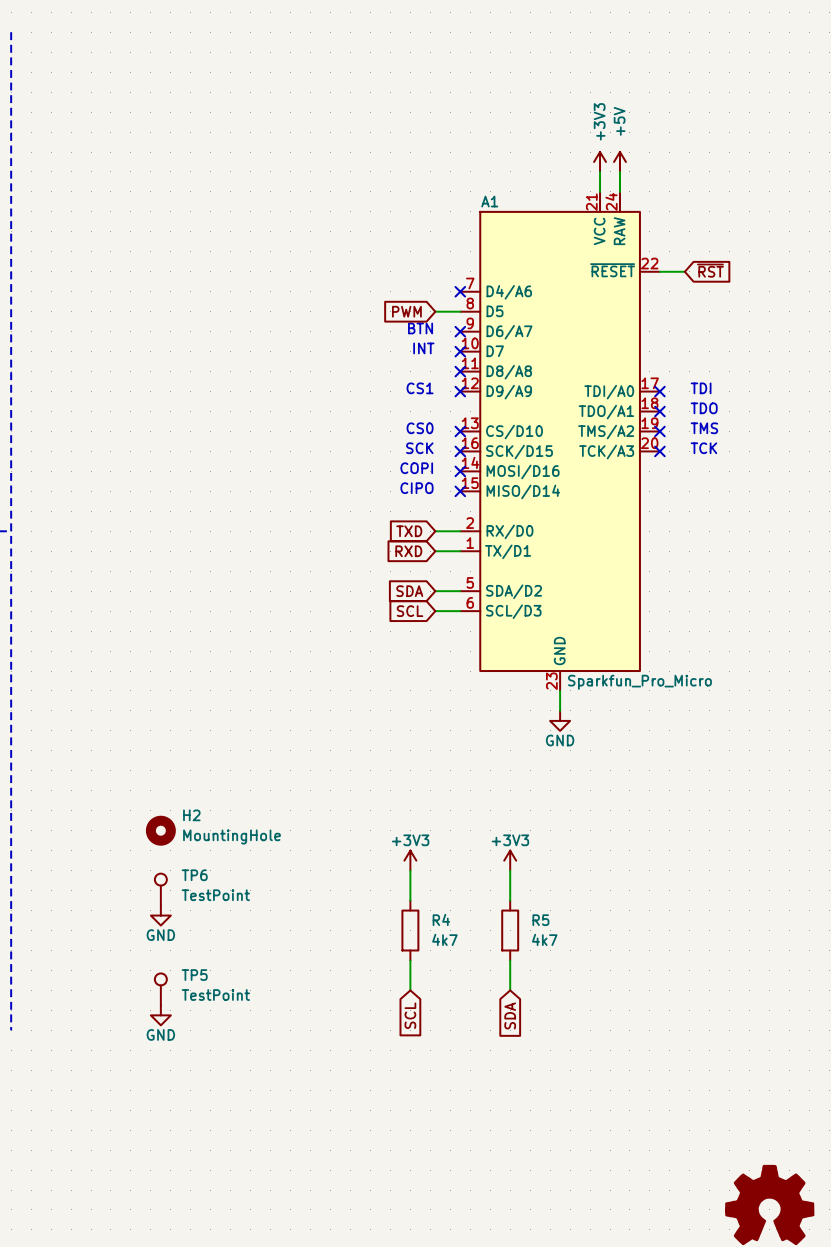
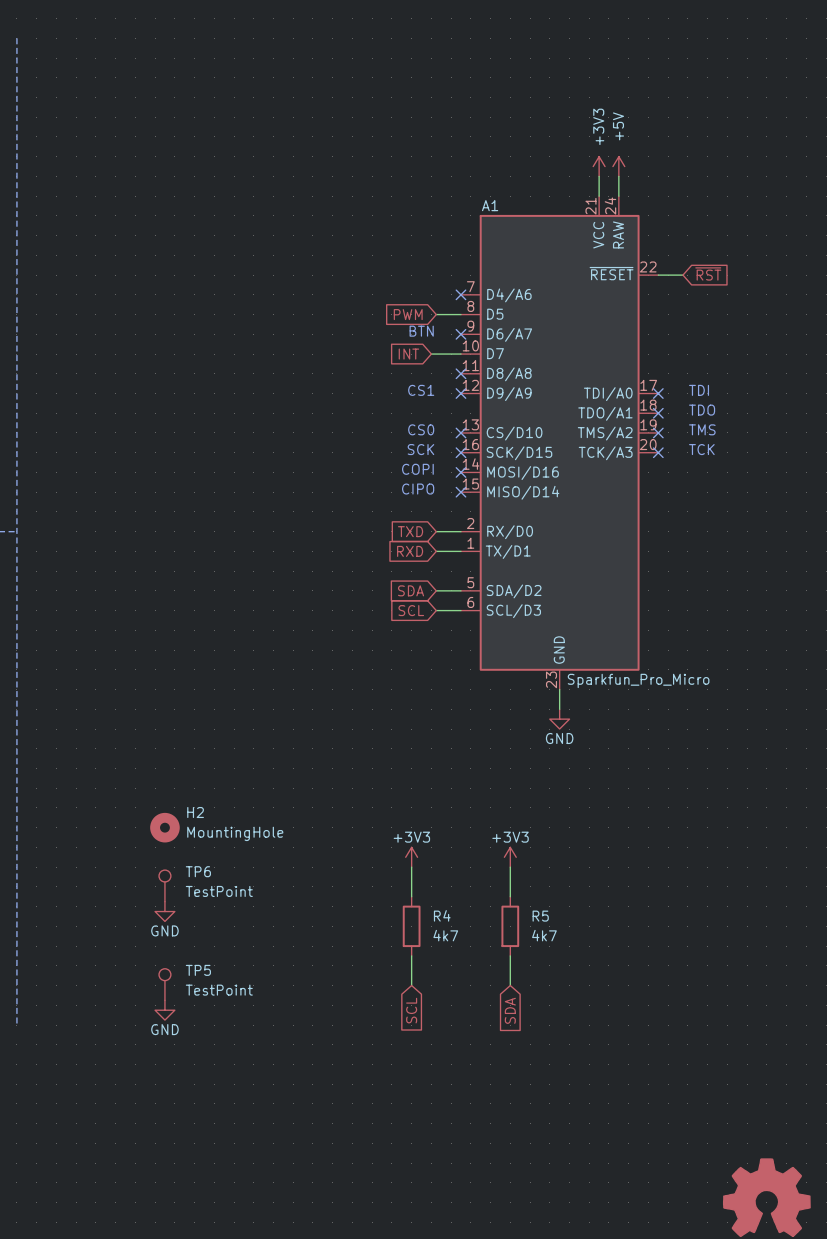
text: INT (423, 348) -> none
global label: none -> INT (408, 354)
wire: none -> (431, 354) (460, 354)
no-connect mark: (460, 351) -> none

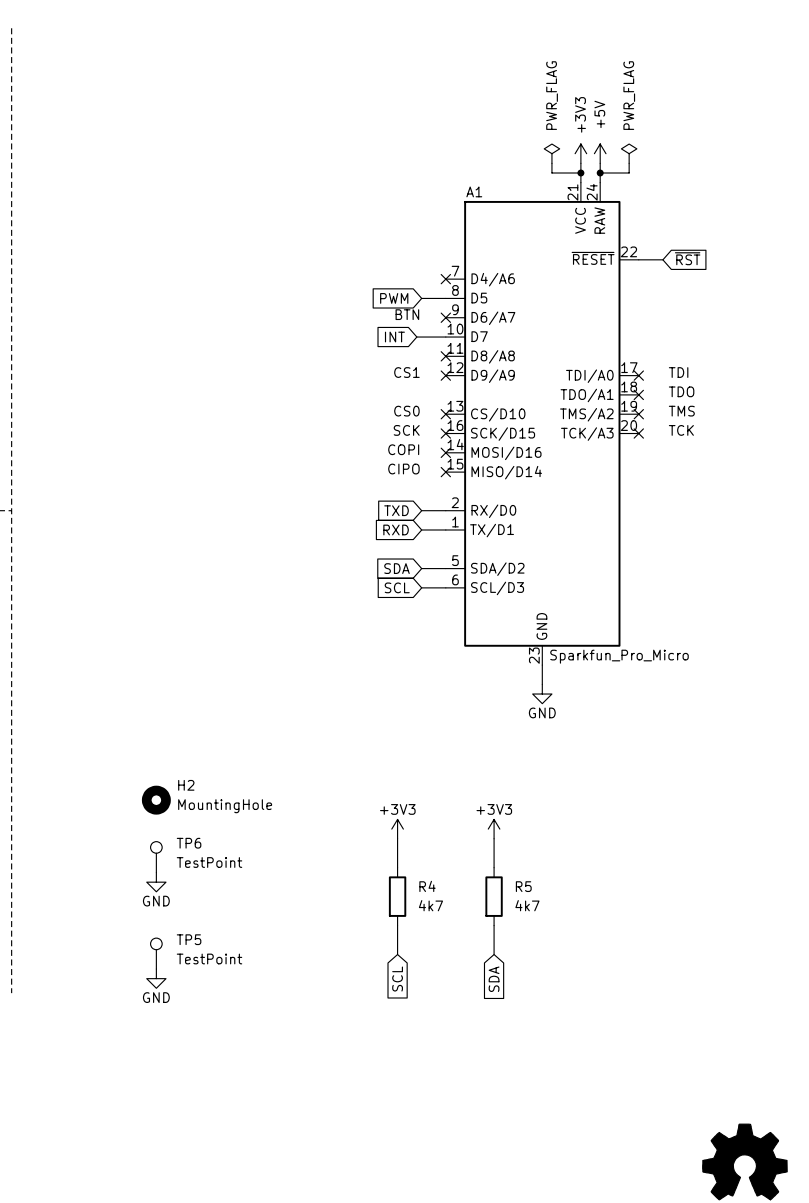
power symbol: none -> PWR_FLAG (551, 153)
power symbol: none -> PWR_FLAG (629, 153)
wire: none -> (551, 163) (551, 173) (580, 173)
wire: none -> (629, 163) (629, 173) (600, 173)
junction: none -> (580, 173)
junction: none -> (600, 173)

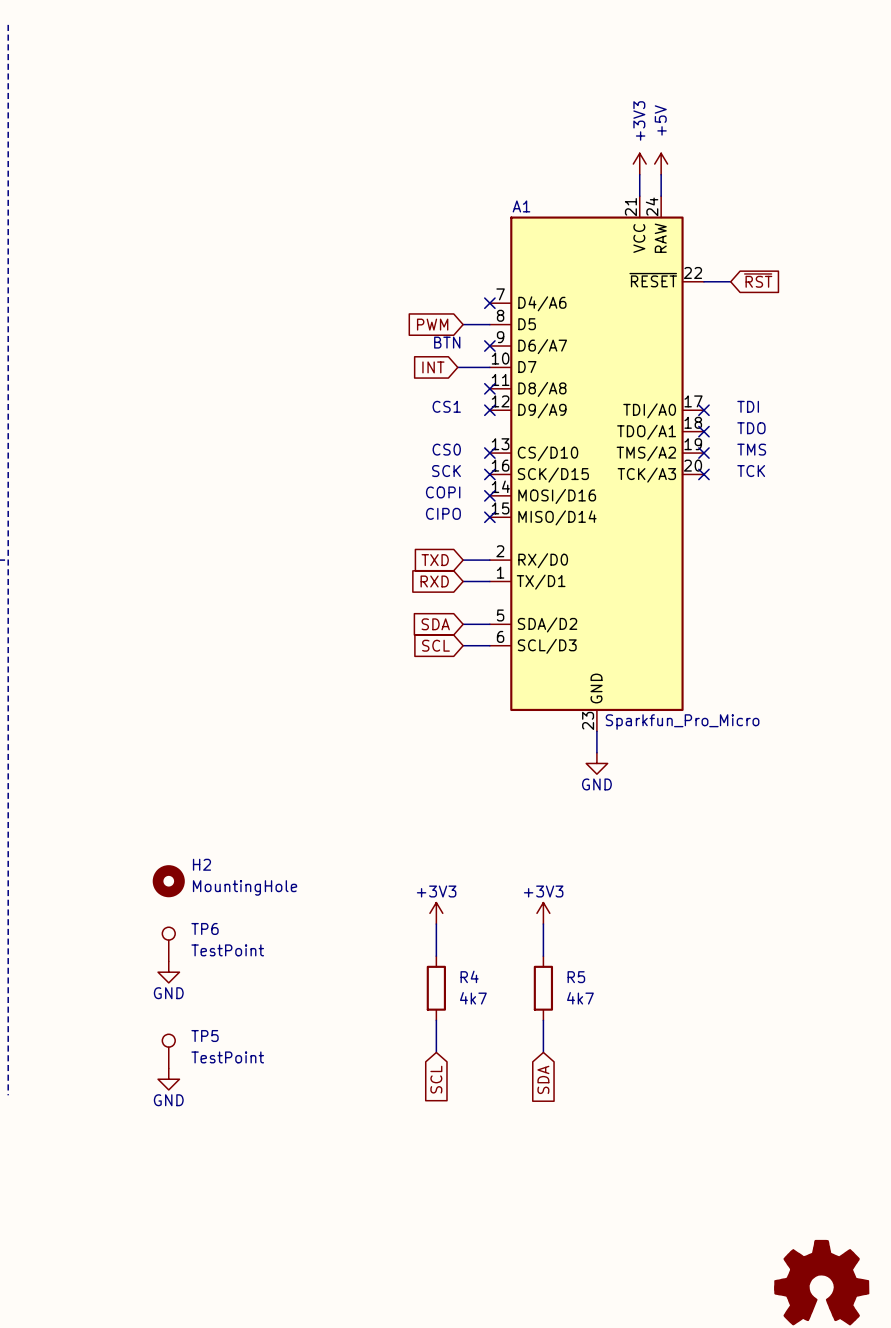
power symbol: PWR_FLAG (551, 153) -> none
power symbol: PWR_FLAG (629, 153) -> none
wire: (551, 163) (551, 173) (580, 173) -> none
wire: (629, 163) (629, 173) (600, 173) -> none
junction: (580, 173) -> none
junction: (600, 173) -> none

